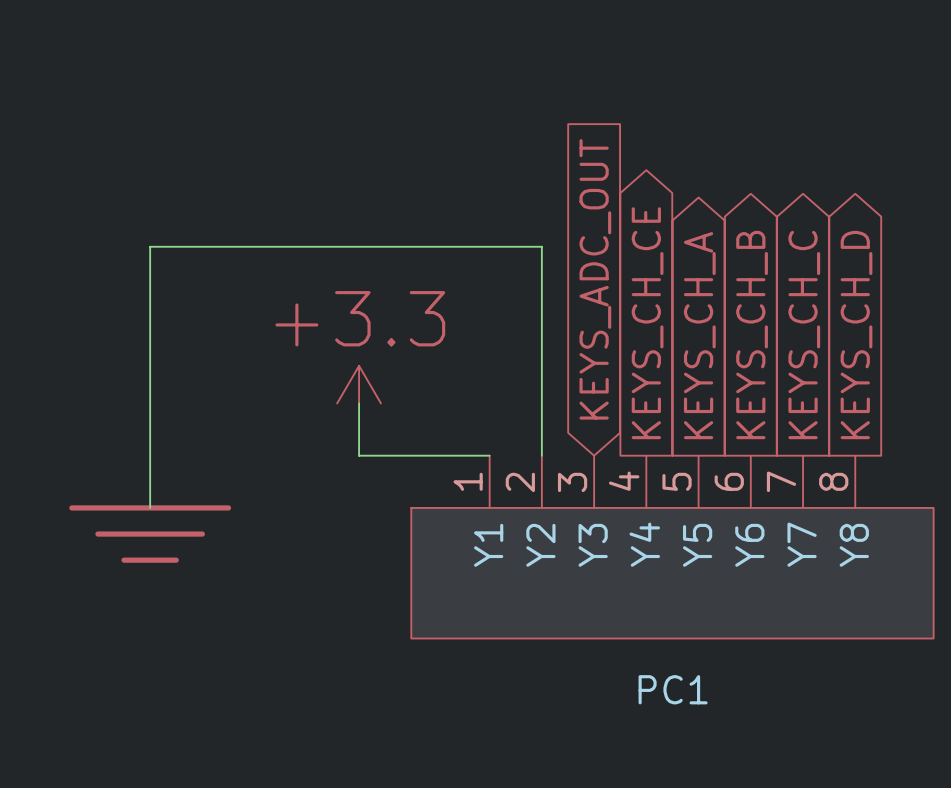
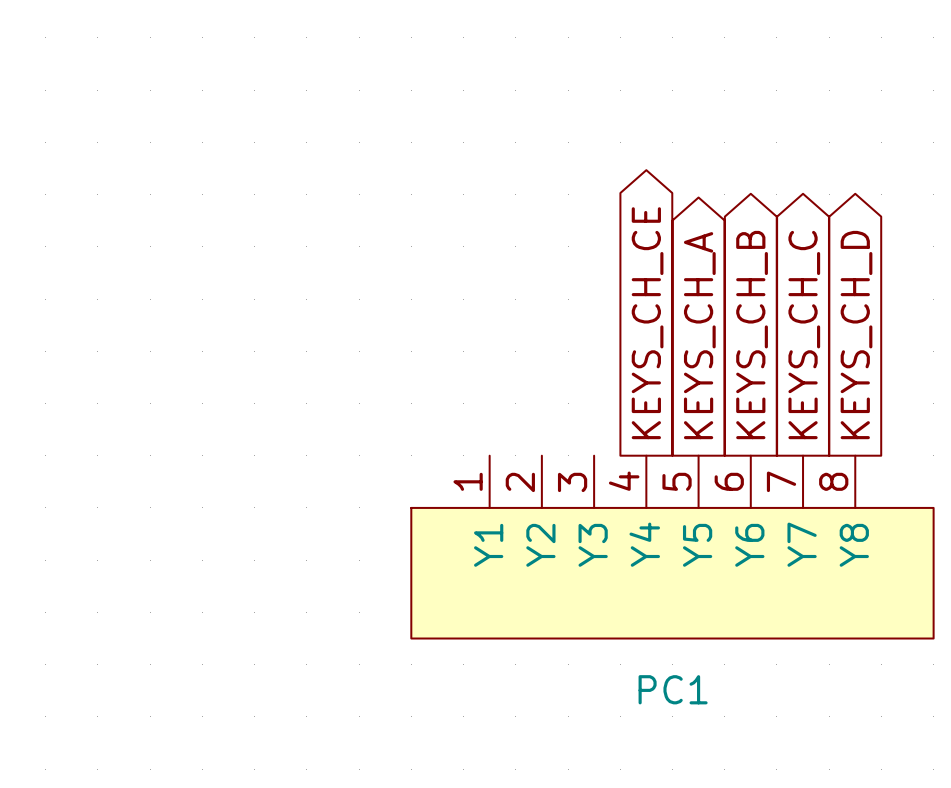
global label: KEYS_ADC_OUT (595, 279) -> none
power symbol: (359, 384) -> none
wire: (359, 403) (359, 455) (489, 455) -> none
wire: (541, 455) (541, 246) (150, 246) (150, 507) -> none
power symbol: (150, 534) -> none

